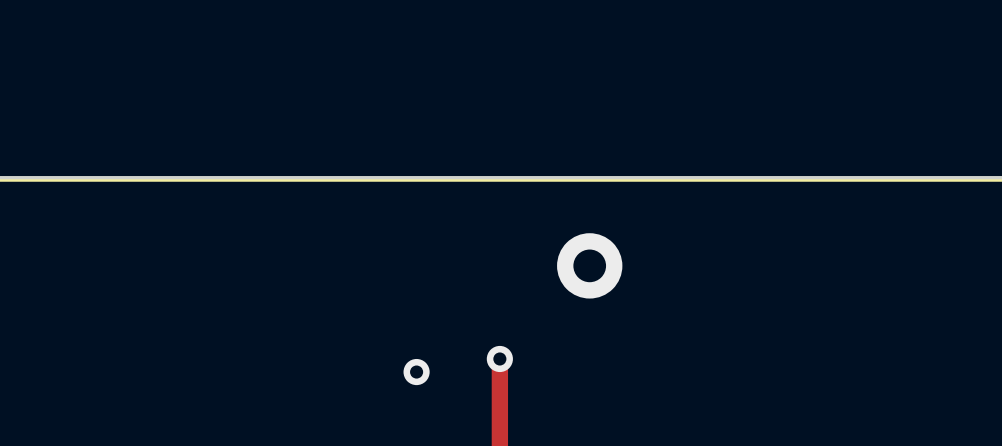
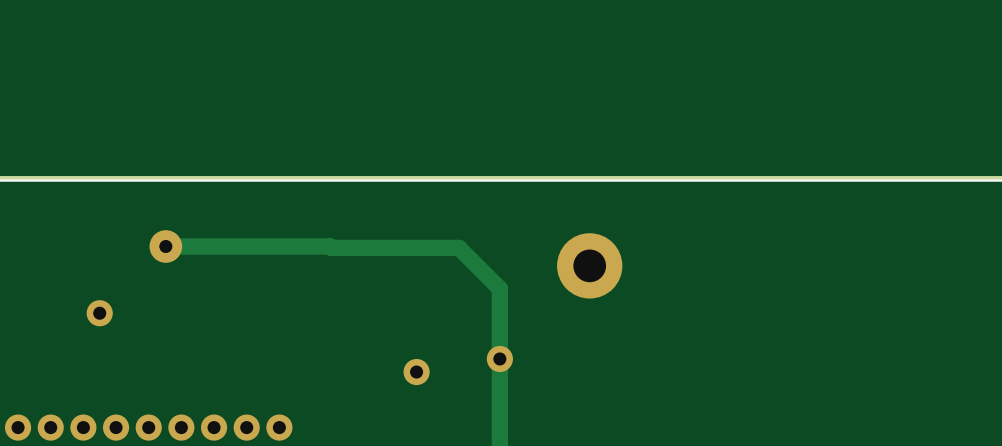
track: none -> (165, 246) (459, 247) (499, 288) (499, 358)
via: none -> (165, 246)
via: none -> (99, 313)
via: none -> (18, 427)
via: none -> (50, 427)
via: none -> (83, 427)
via: none -> (116, 427)
via: none -> (148, 427)
via: none -> (181, 427)
via: none -> (214, 427)
via: none -> (246, 427)
via: none -> (279, 427)

